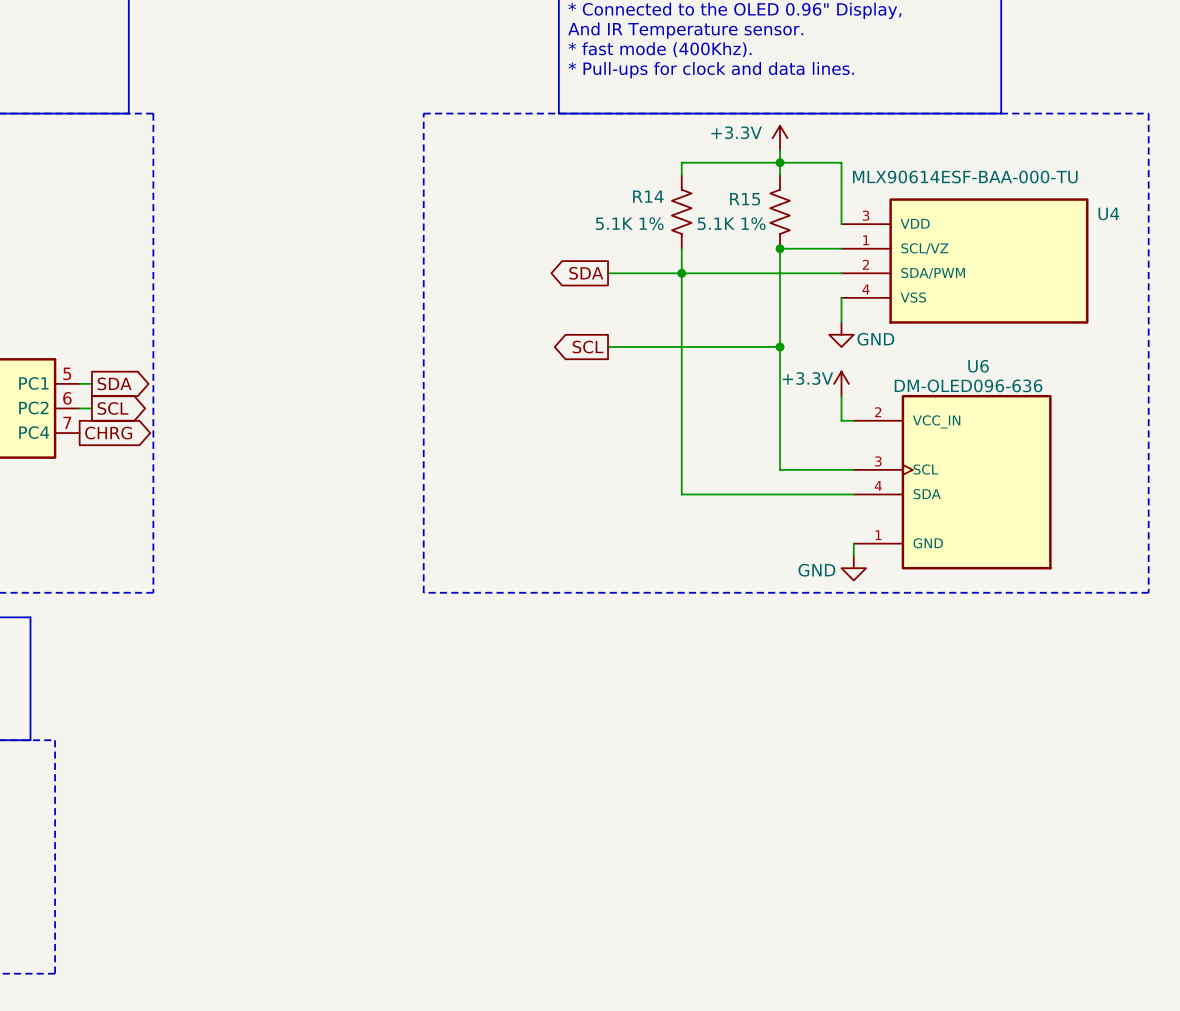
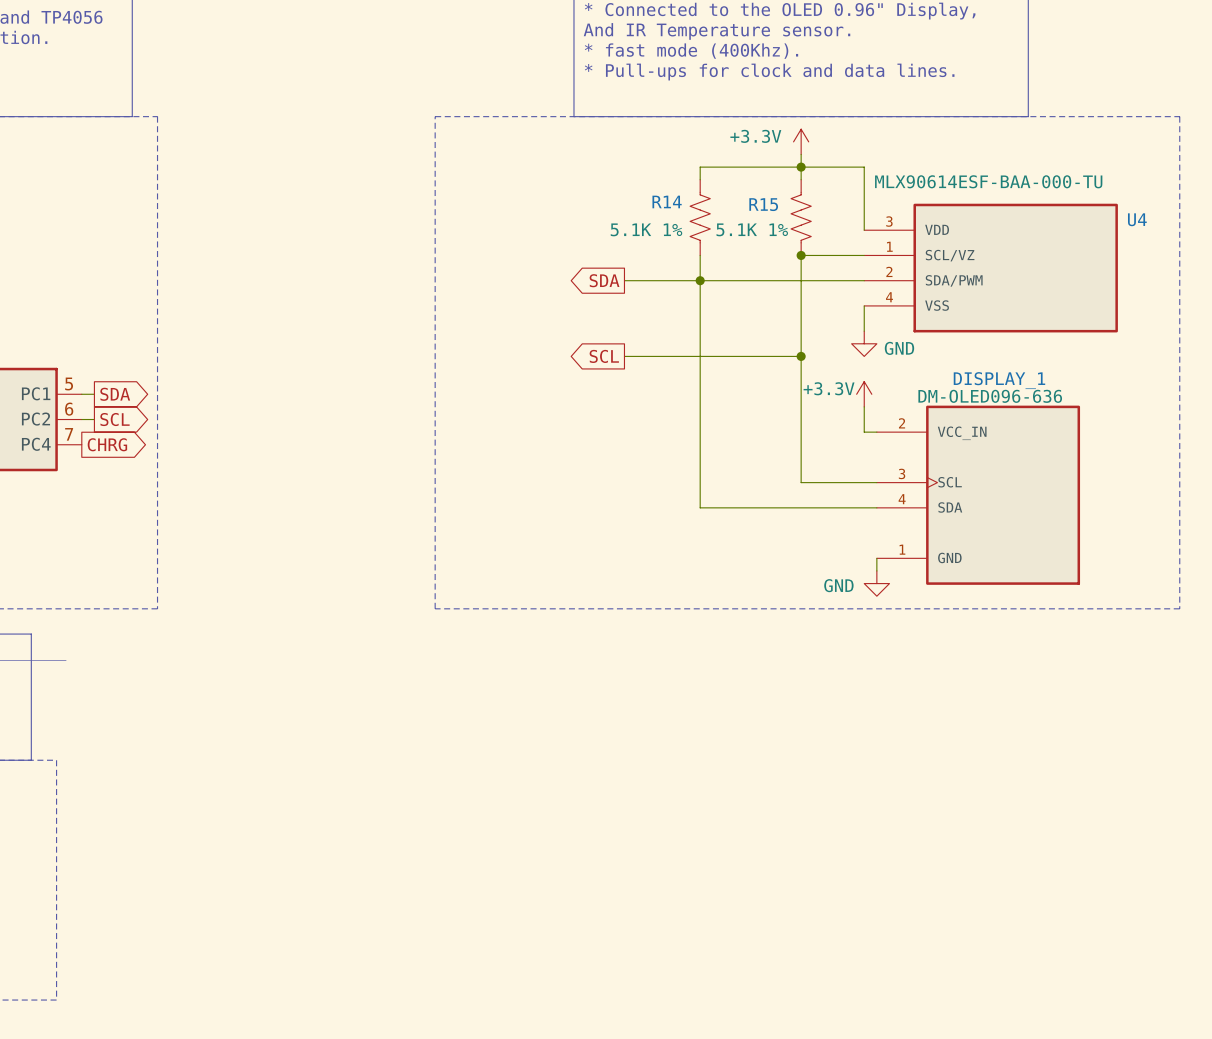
U6 name: U6 (978, 366) -> DISPLAY_1 (999, 380)

